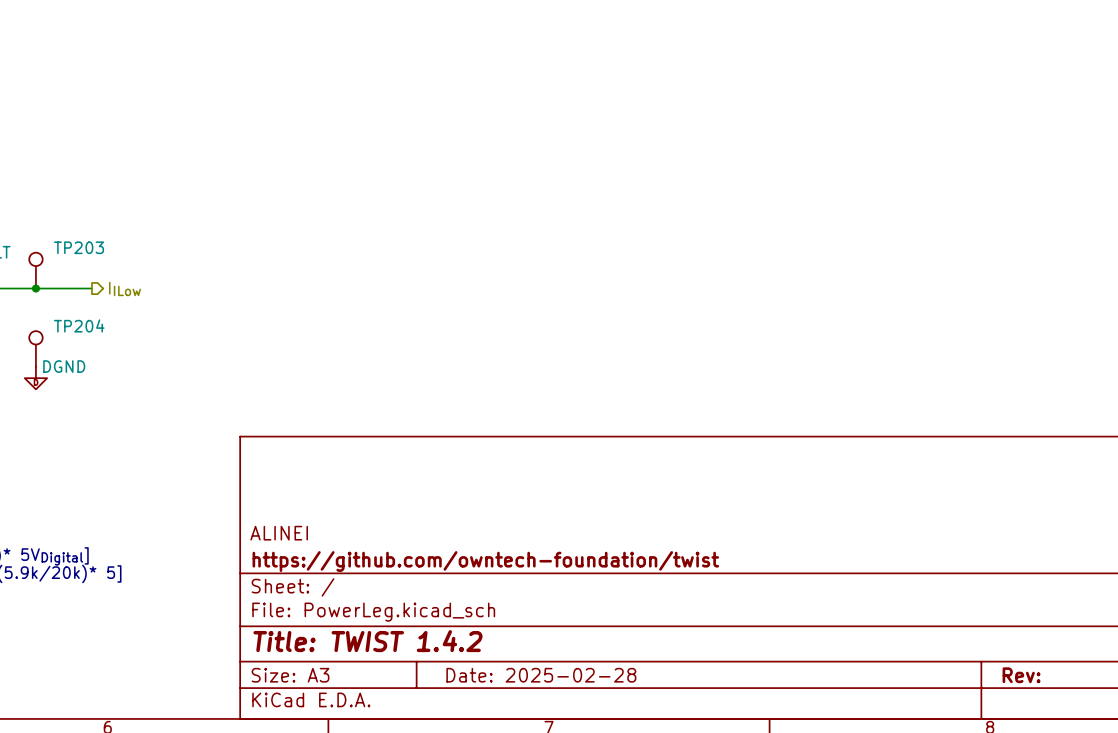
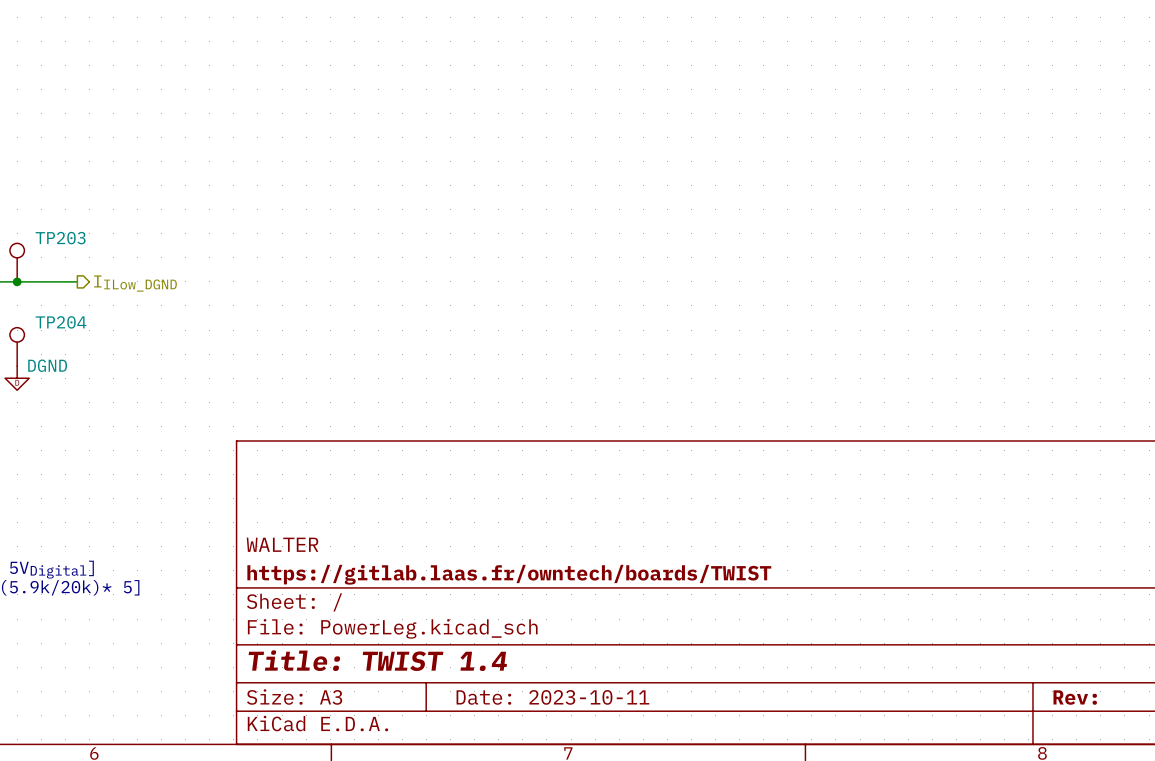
hierarchical label: IILow (124, 288) -> IILow_DGND (135, 283)
title block: ALINEI (279, 533) -> WALTER (282, 544)
title block: https://github.com/owntech-foundation/twist (485, 561) -> https://gitlab.laas.fr/owntech/boards/TWIST (509, 574)
title block: Title: TWIST 1.4.2 (368, 641) -> Title: TWIST 1.4 (377, 660)
title block: Date: 2025-02-28 (541, 675) -> Date: 2023-10-11 (552, 697)

